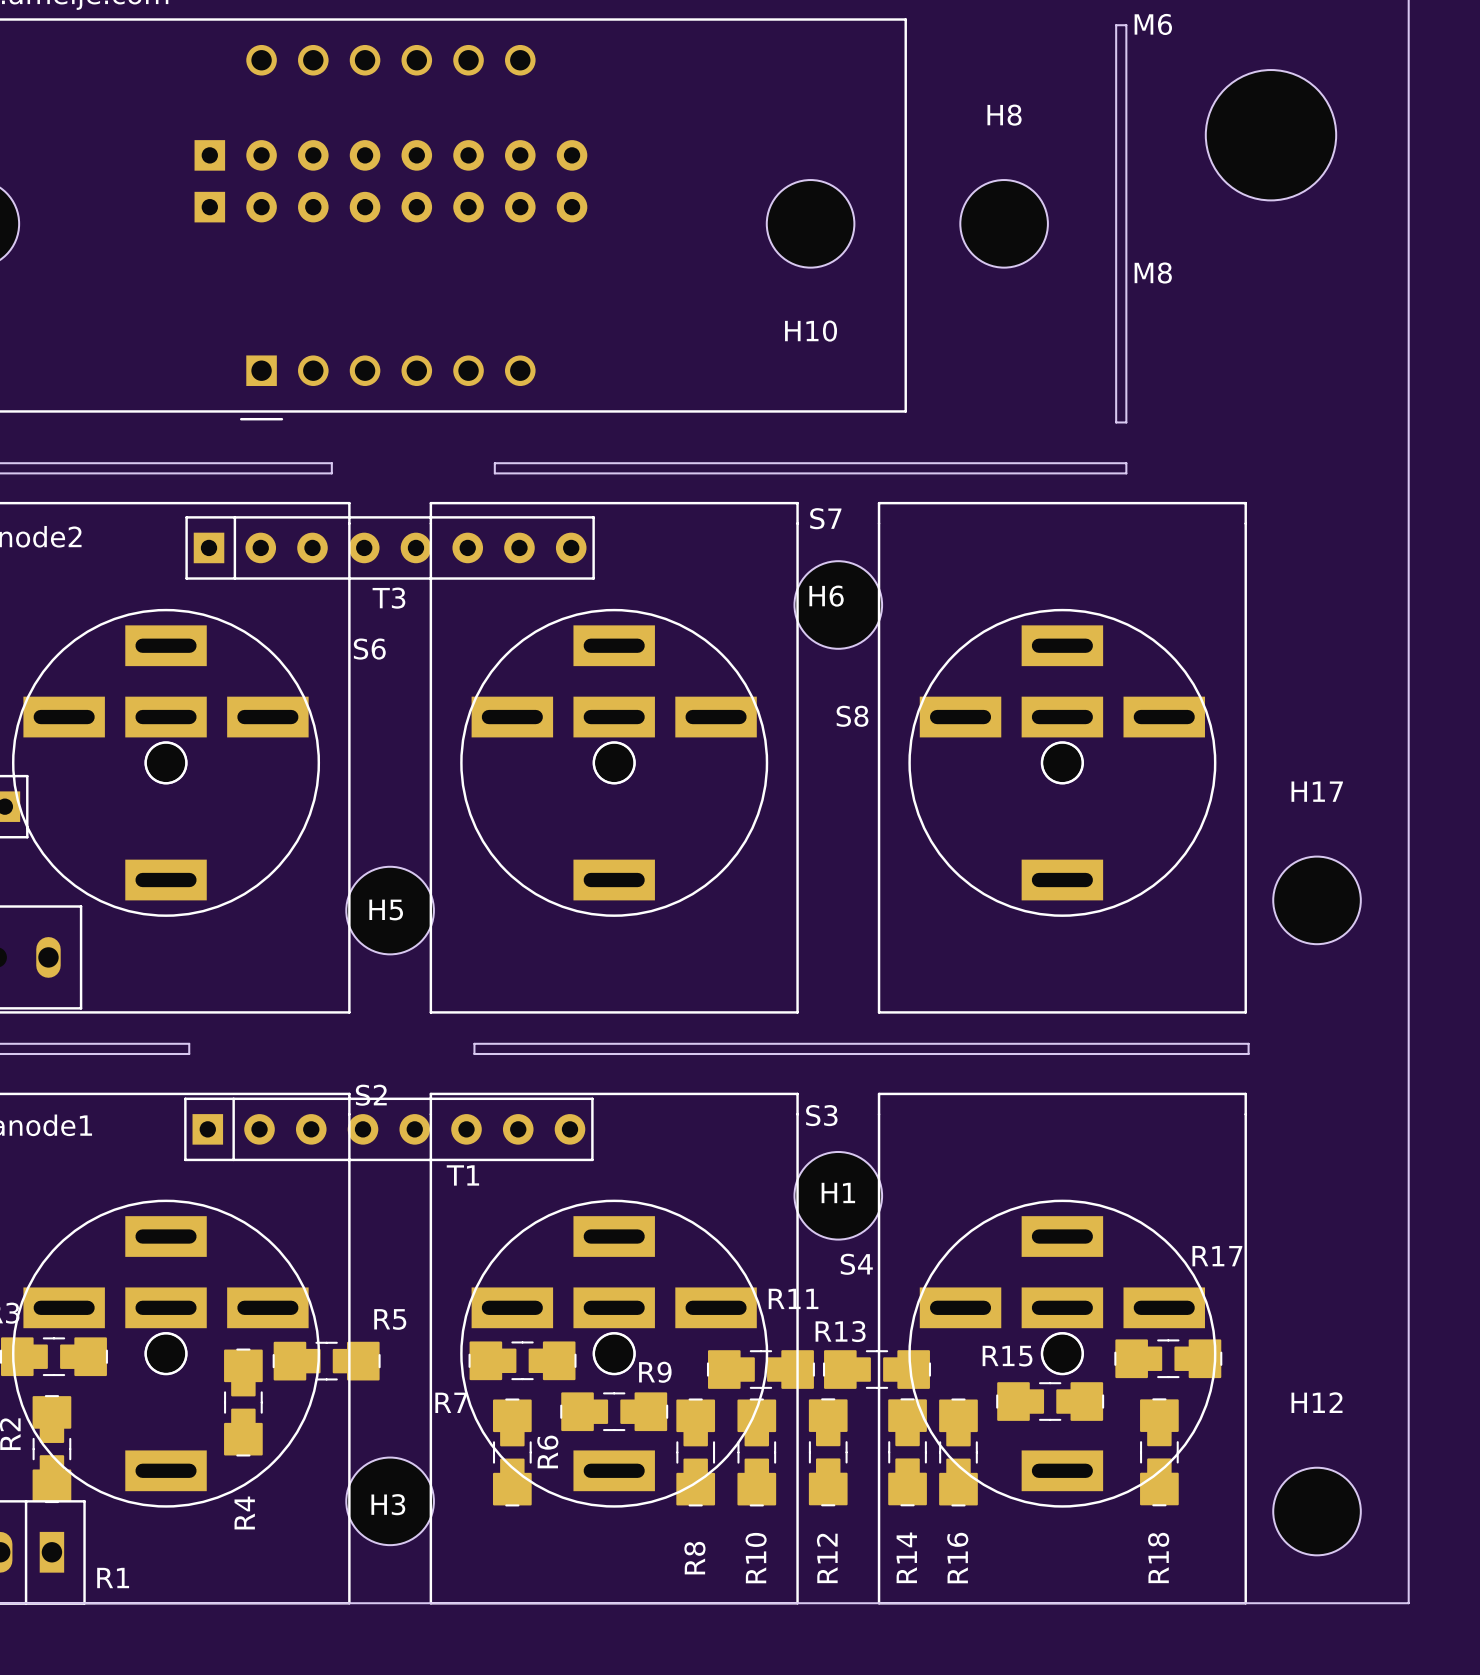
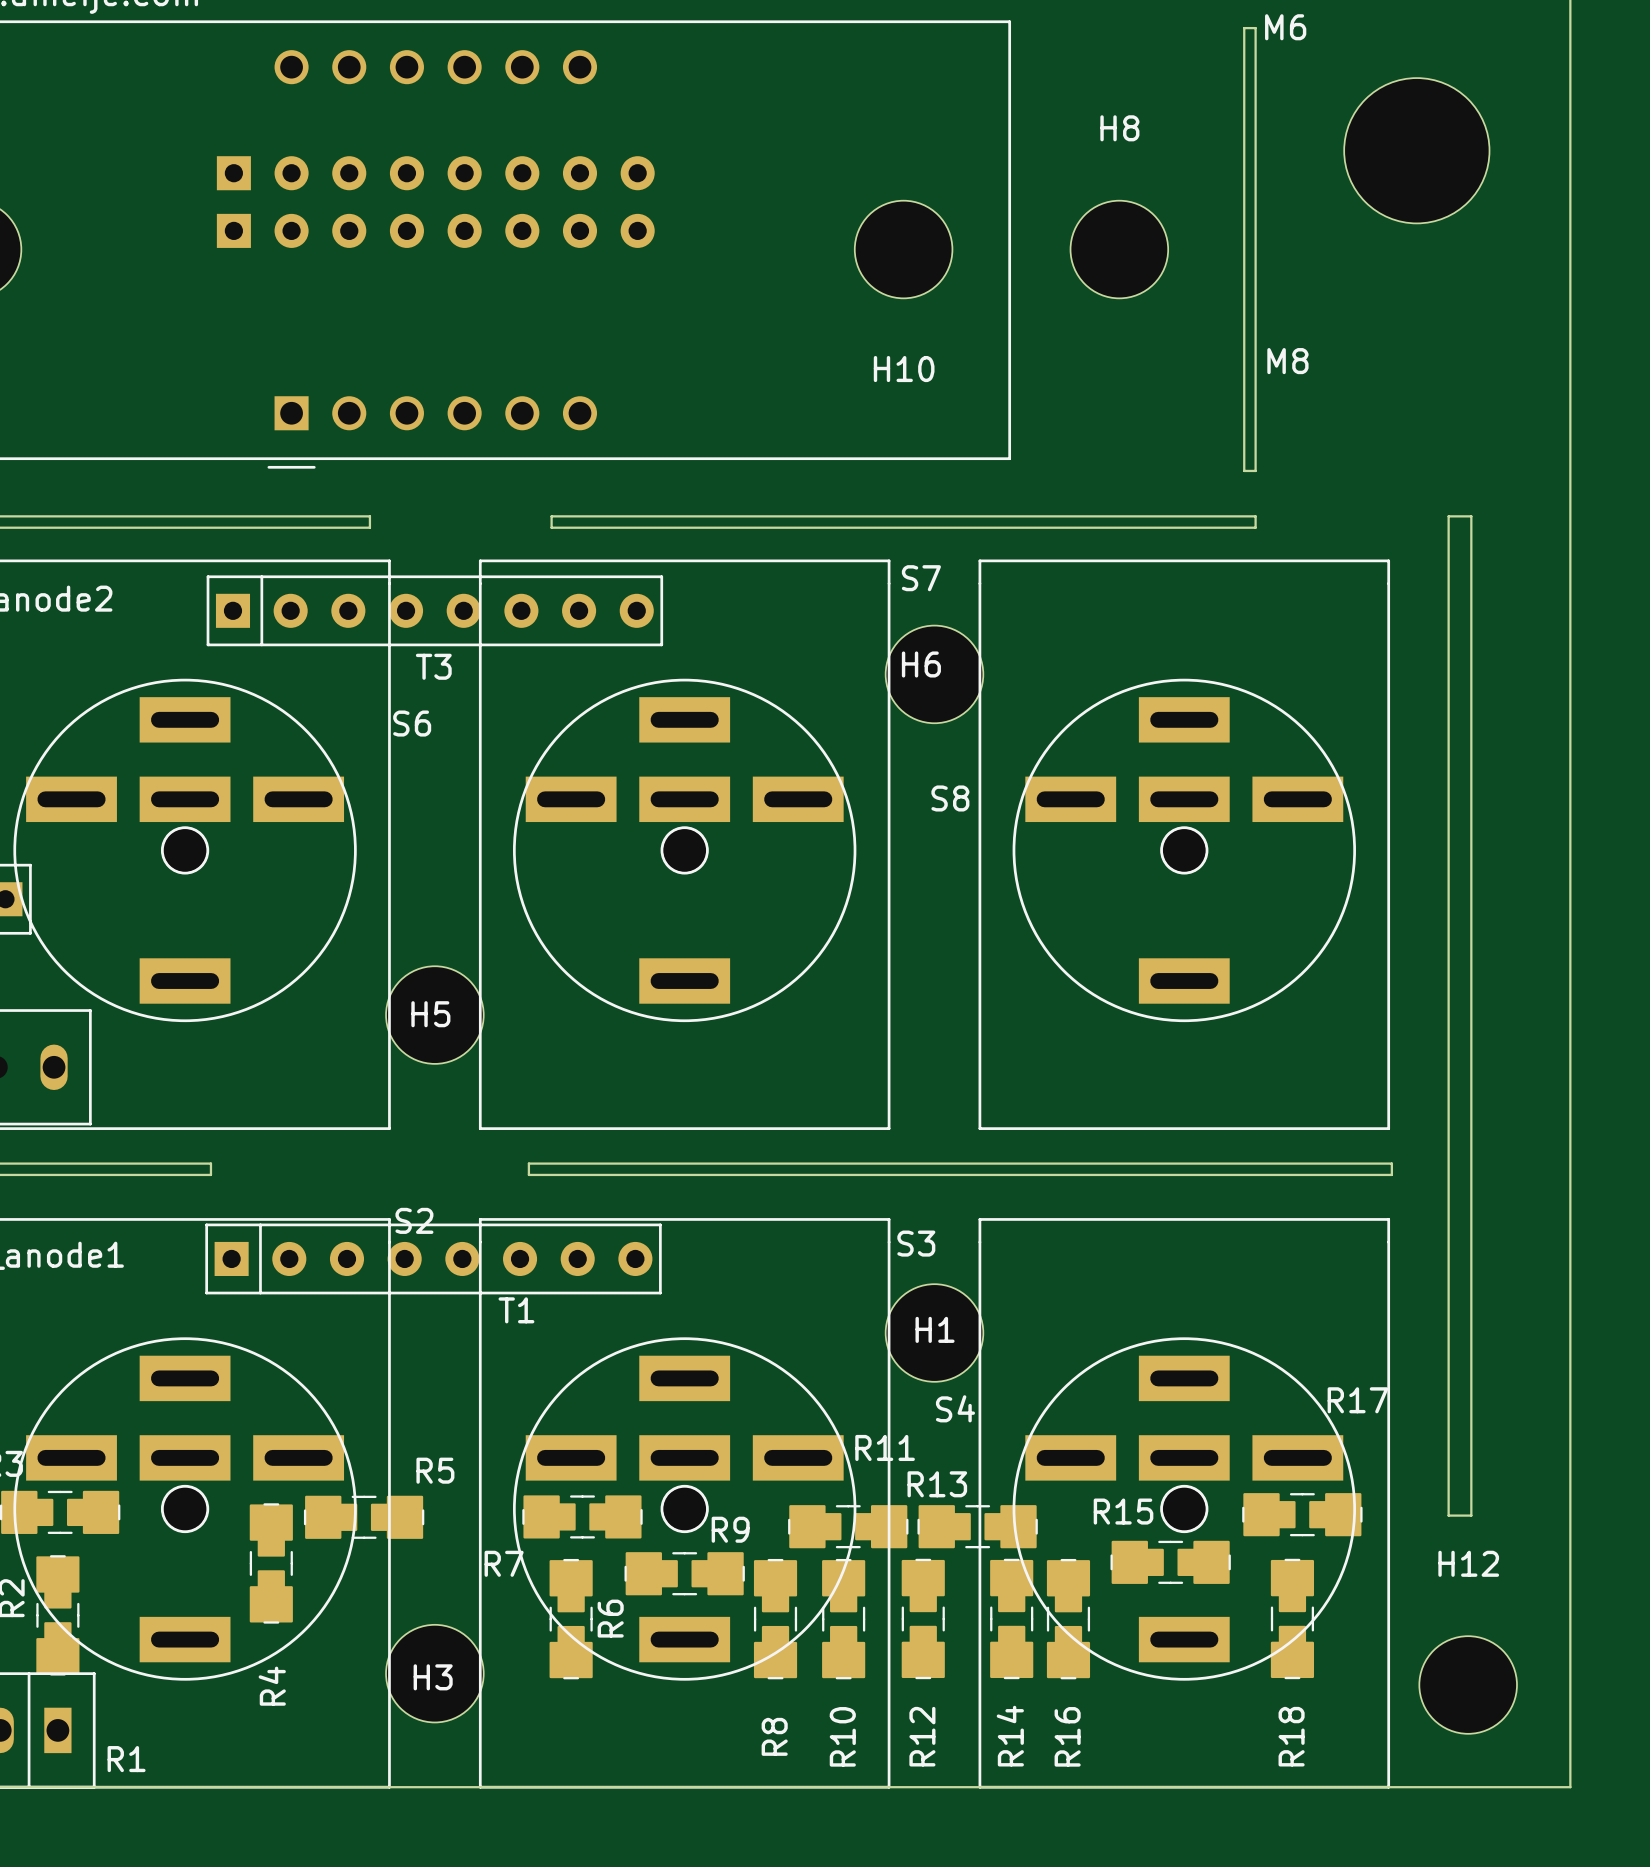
text position: M8 (1153, 273) -> M8 (1287, 361)
board edge: none -> (1448, 516) (1471, 516) (1471, 1515) (1448, 1515) (1448, 516)
H17: (1317, 900) -> none

